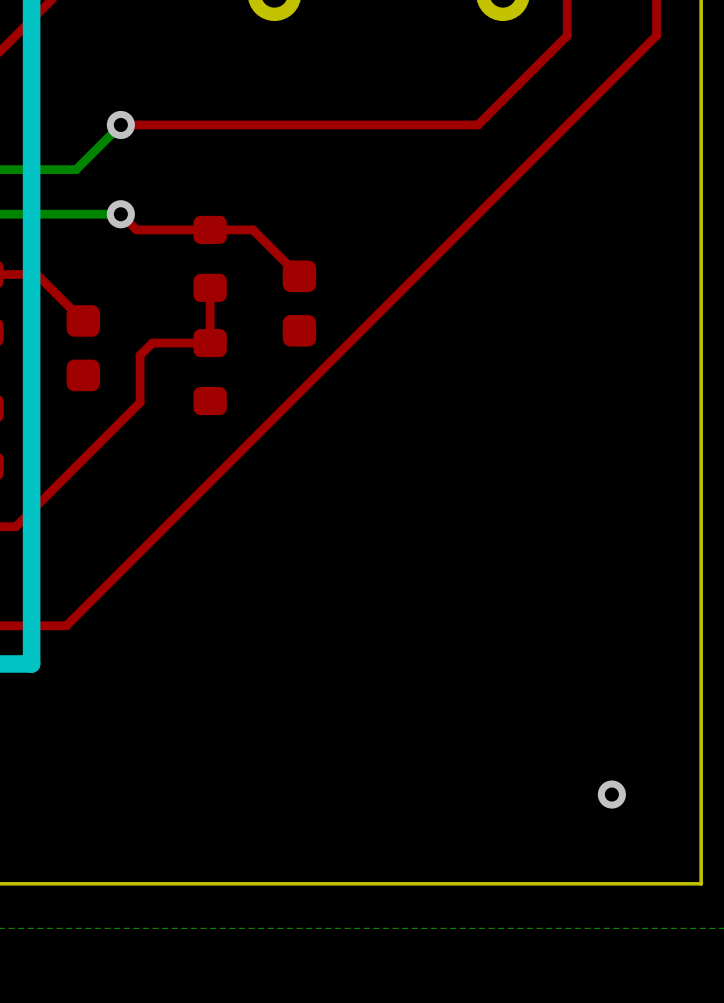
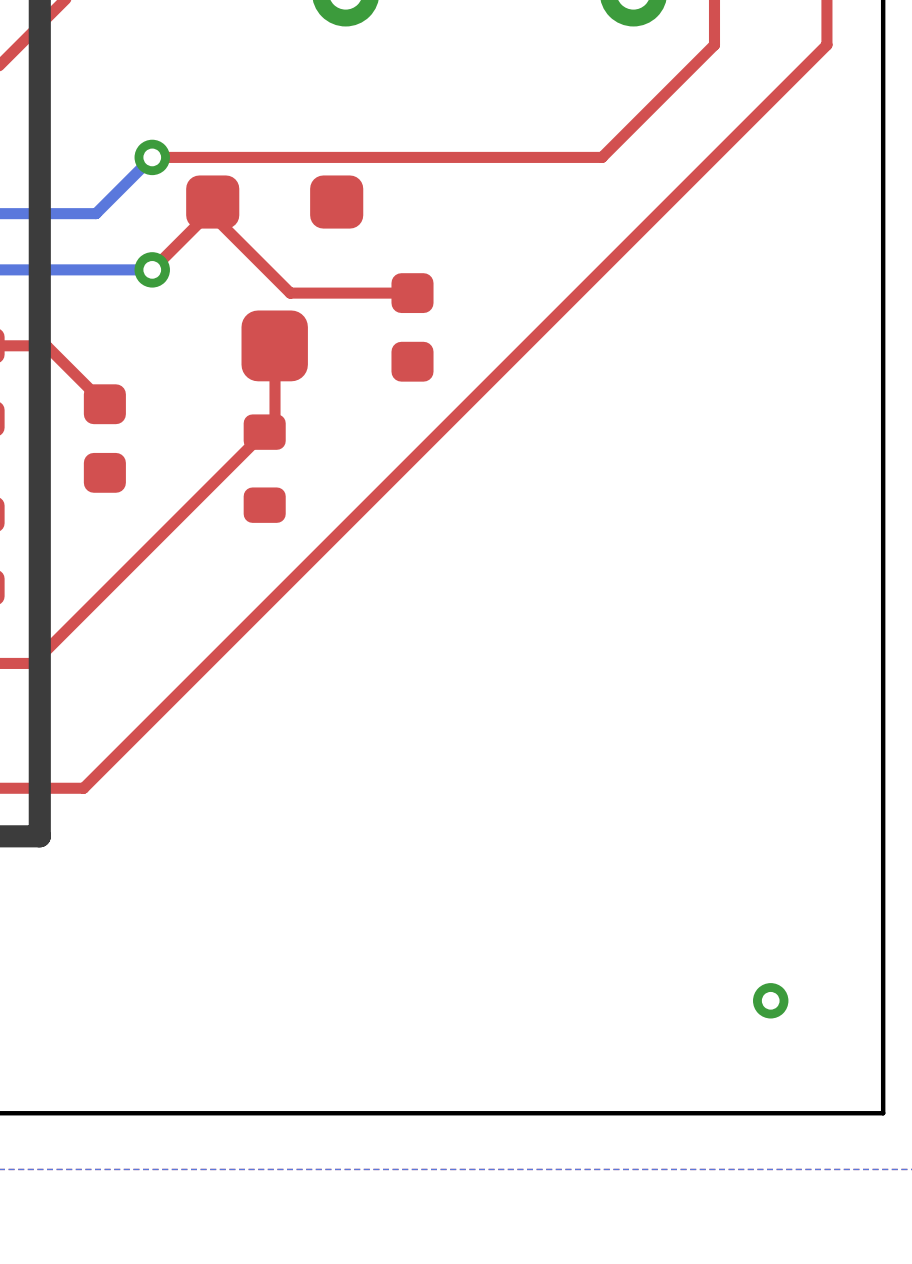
top track: none -> (213, 201) (213, 215) (290, 293) (412, 293)
top track: (120, 214) (136, 229) (253, 229) (299, 276) -> (152, 269) (213, 209)
part: none -> (274, 278)
part: (210, 258) -> none
top track: none -> (275, 345) (275, 421)
top track: (210, 287) (210, 343) (152, 343) (140, 355) (140, 402) (15, 526) -> (276, 420) (33, 663) (19, 663)
part position: (299, 303) -> (412, 327)

